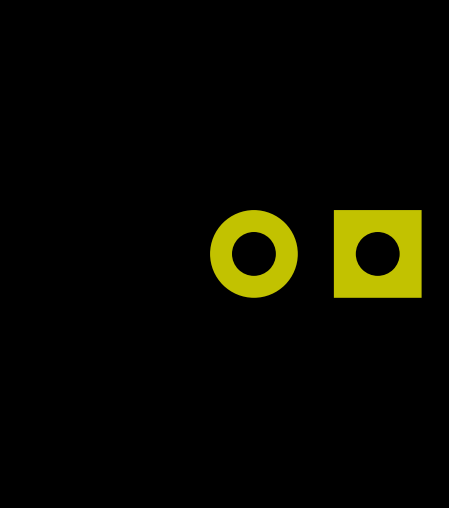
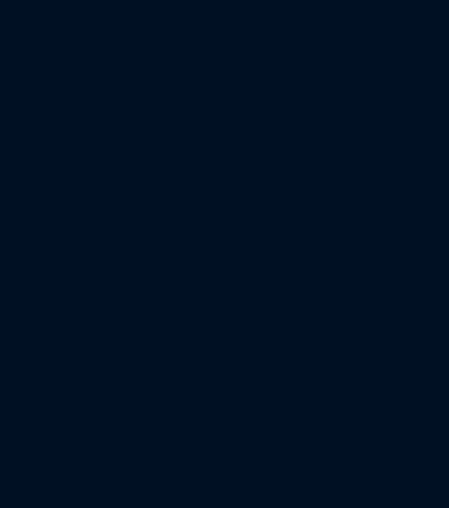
part: (315, 253) -> none

